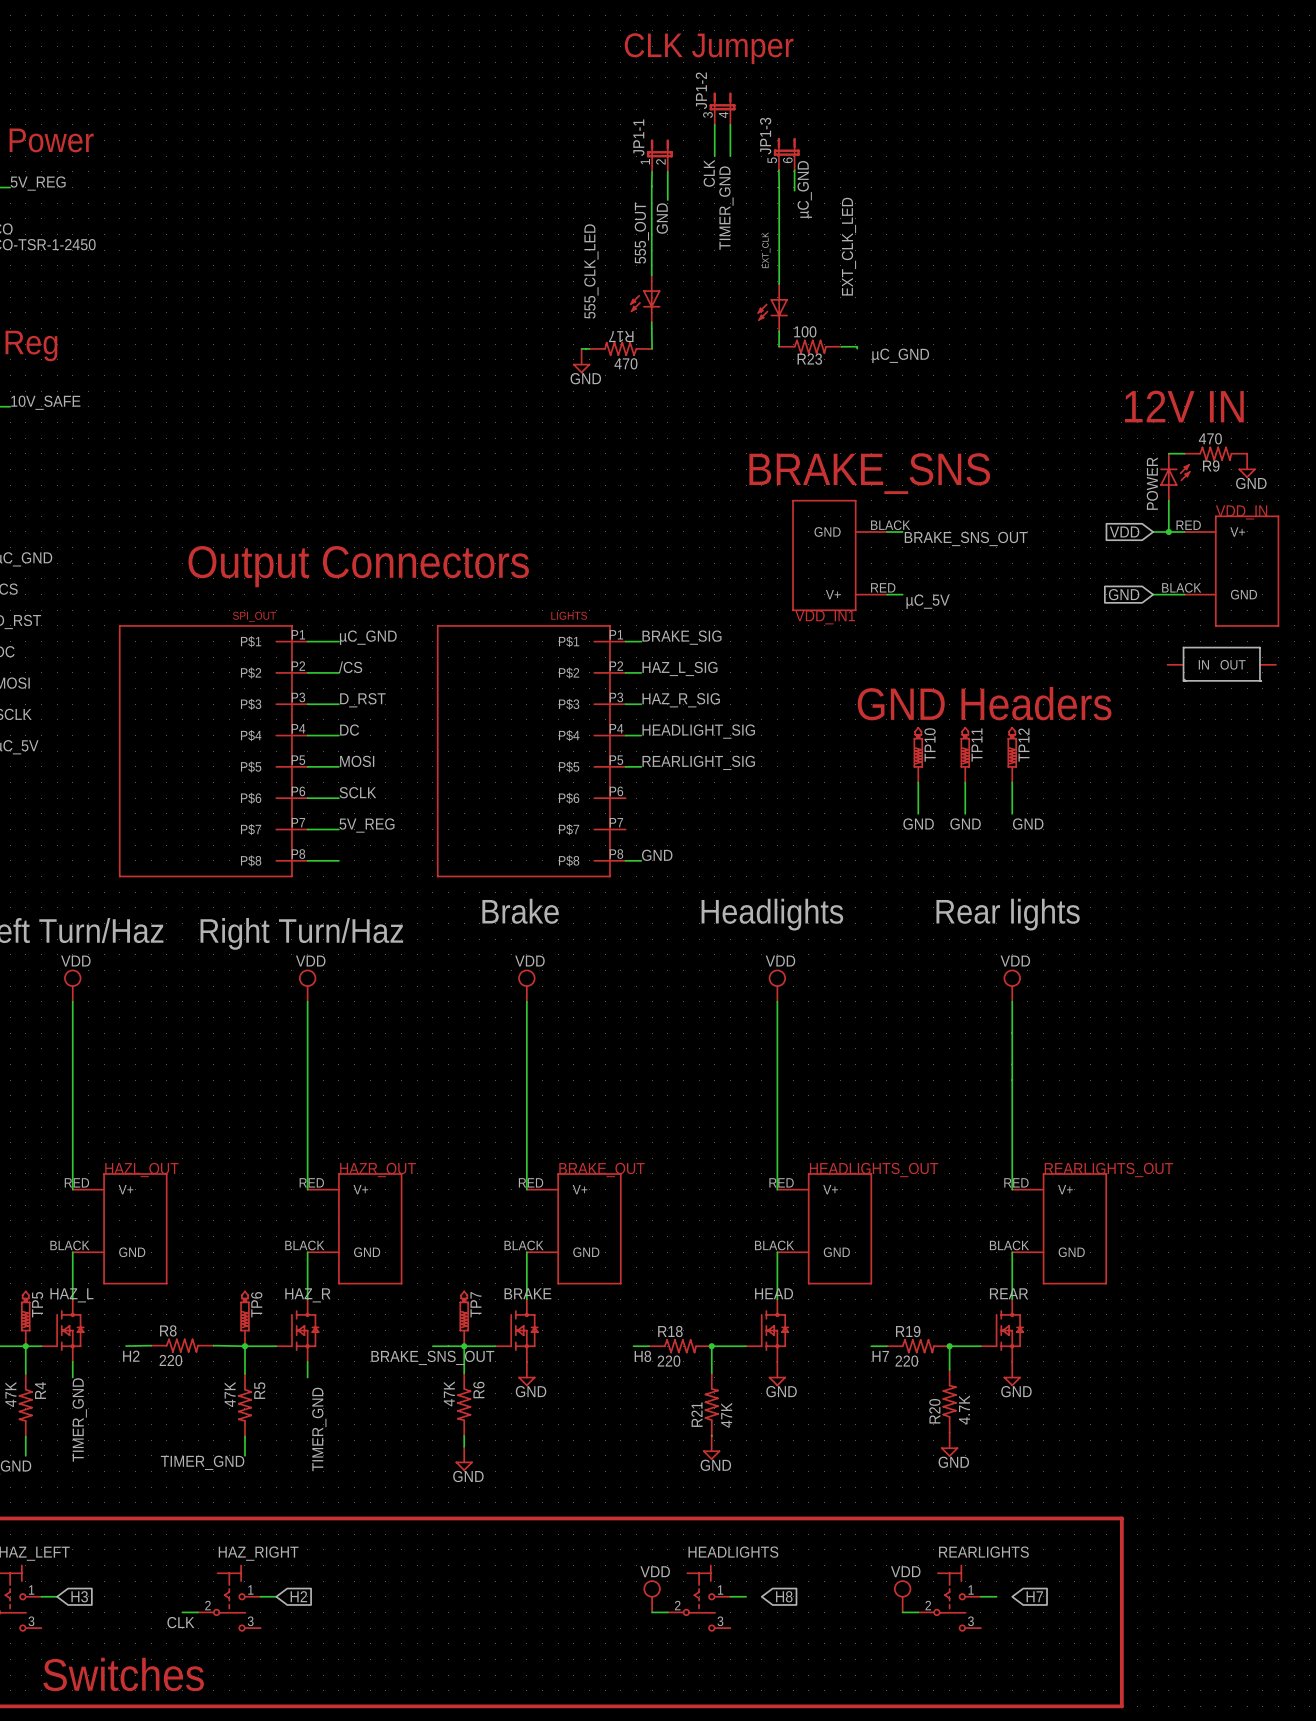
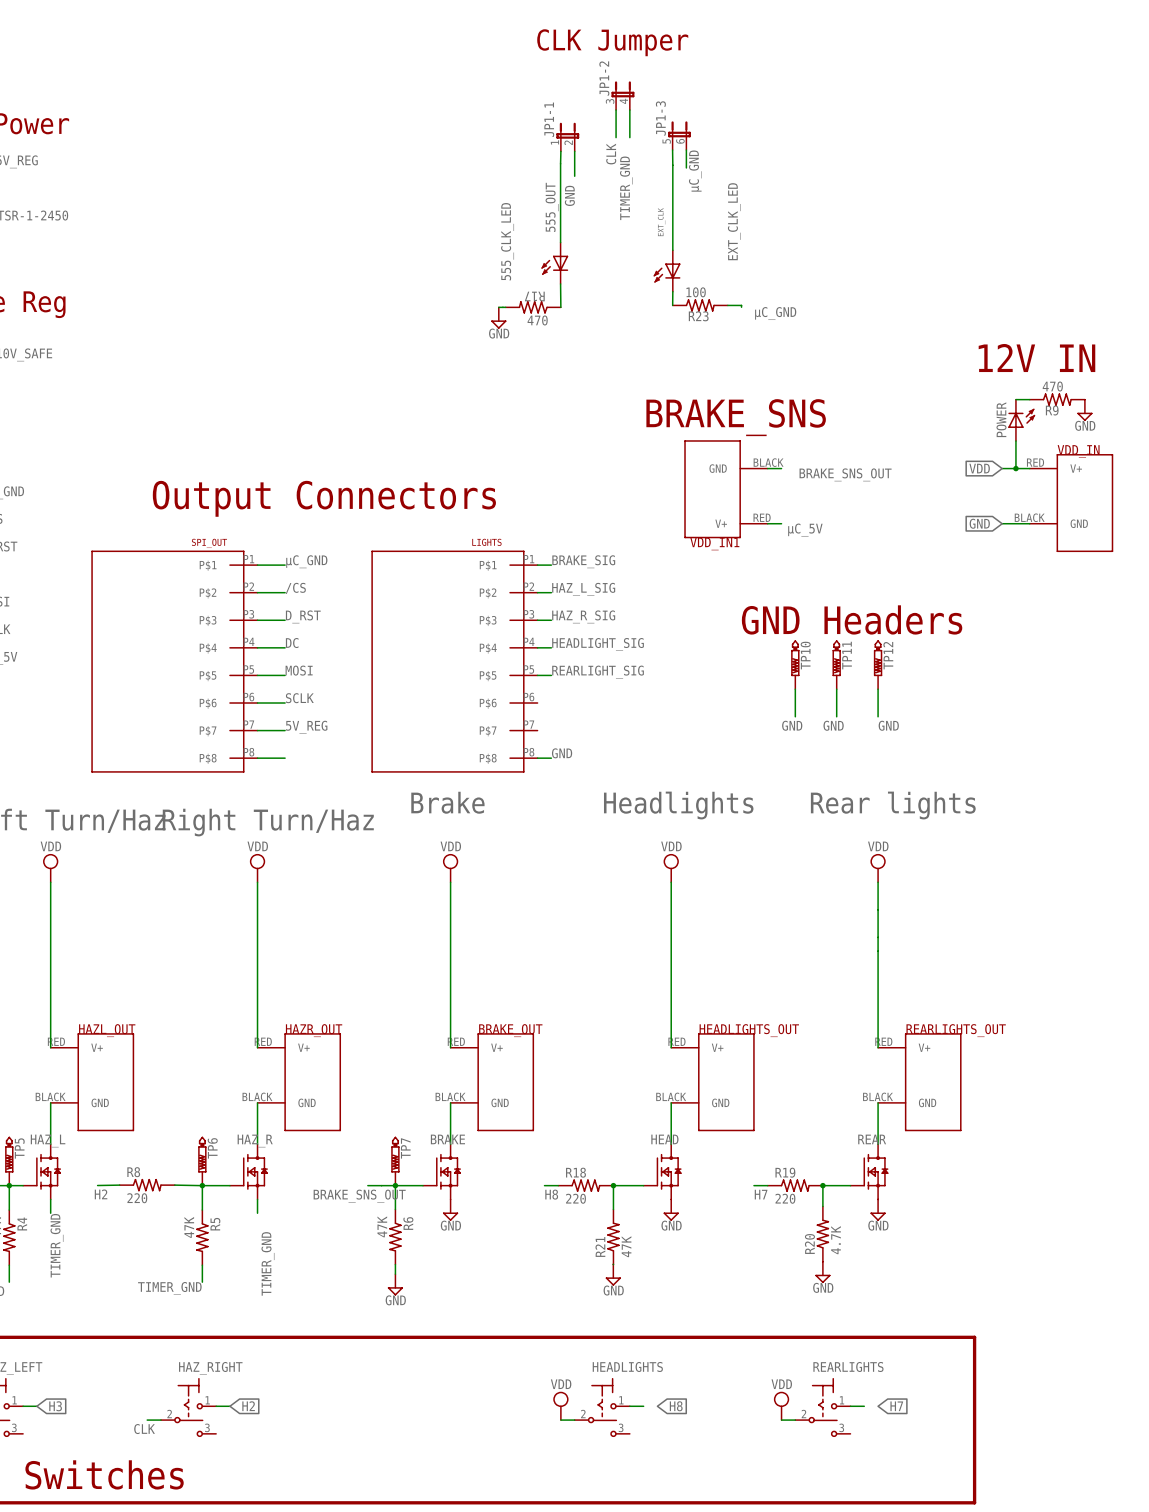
part: (1221, 664) -> none

